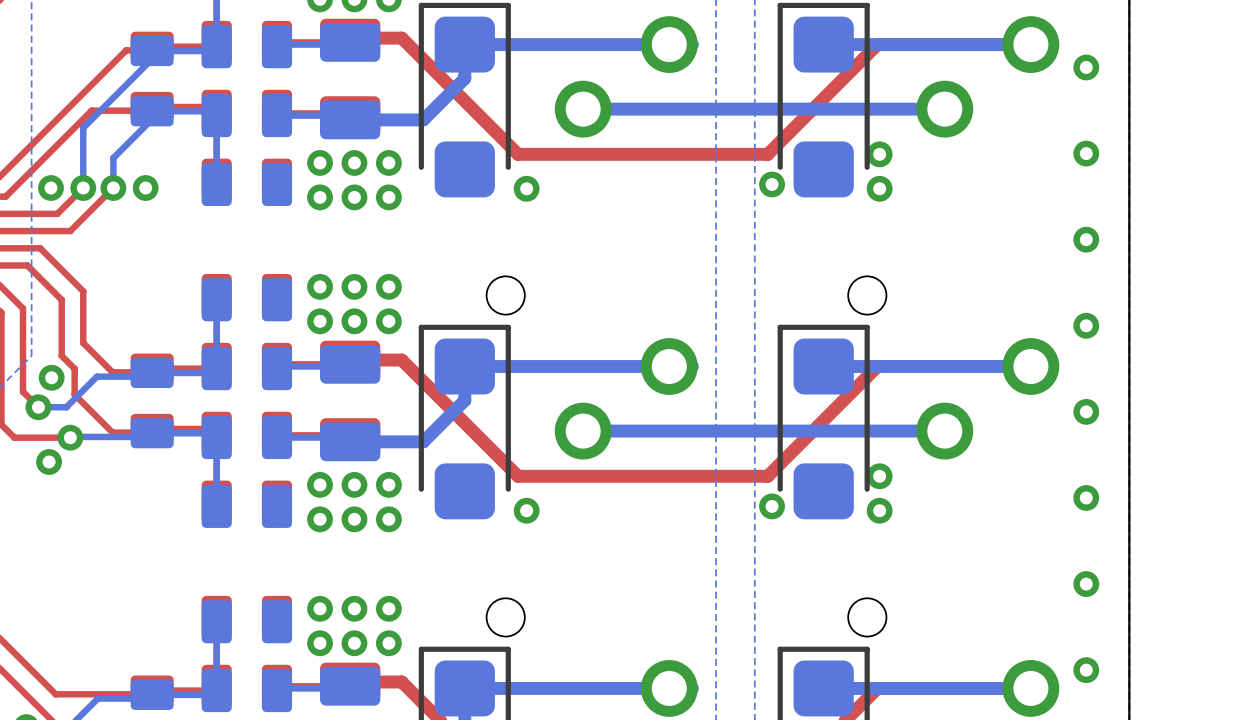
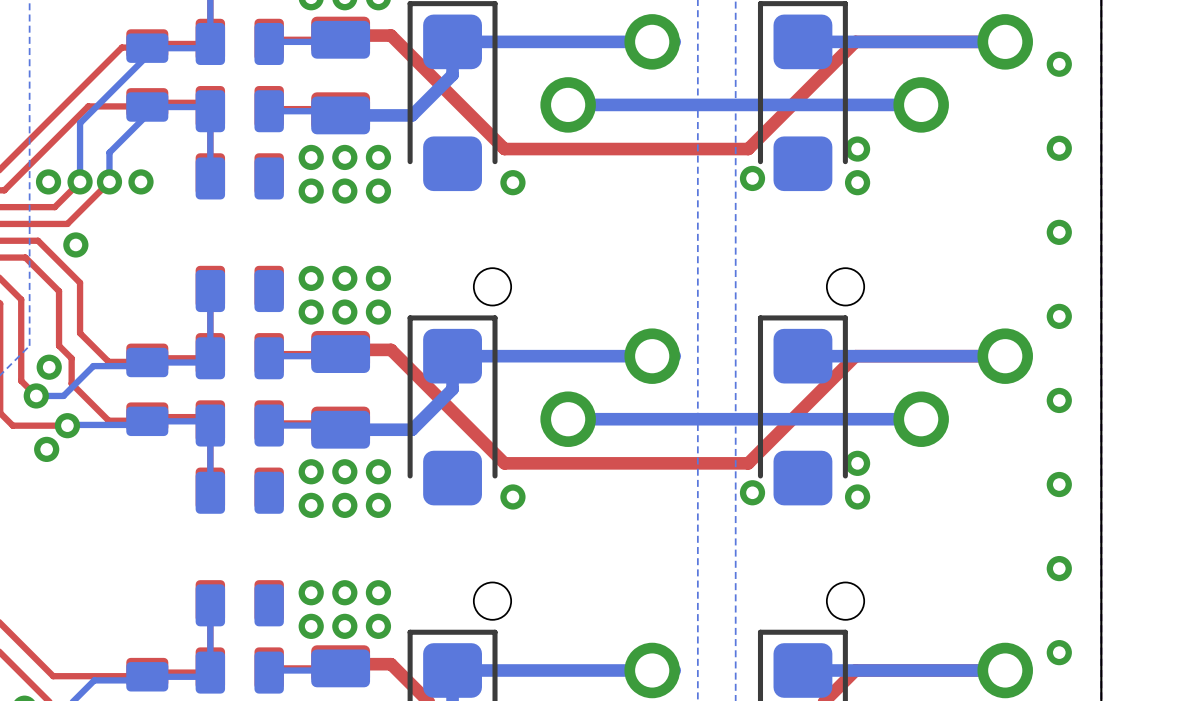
via: none -> (75, 244)

